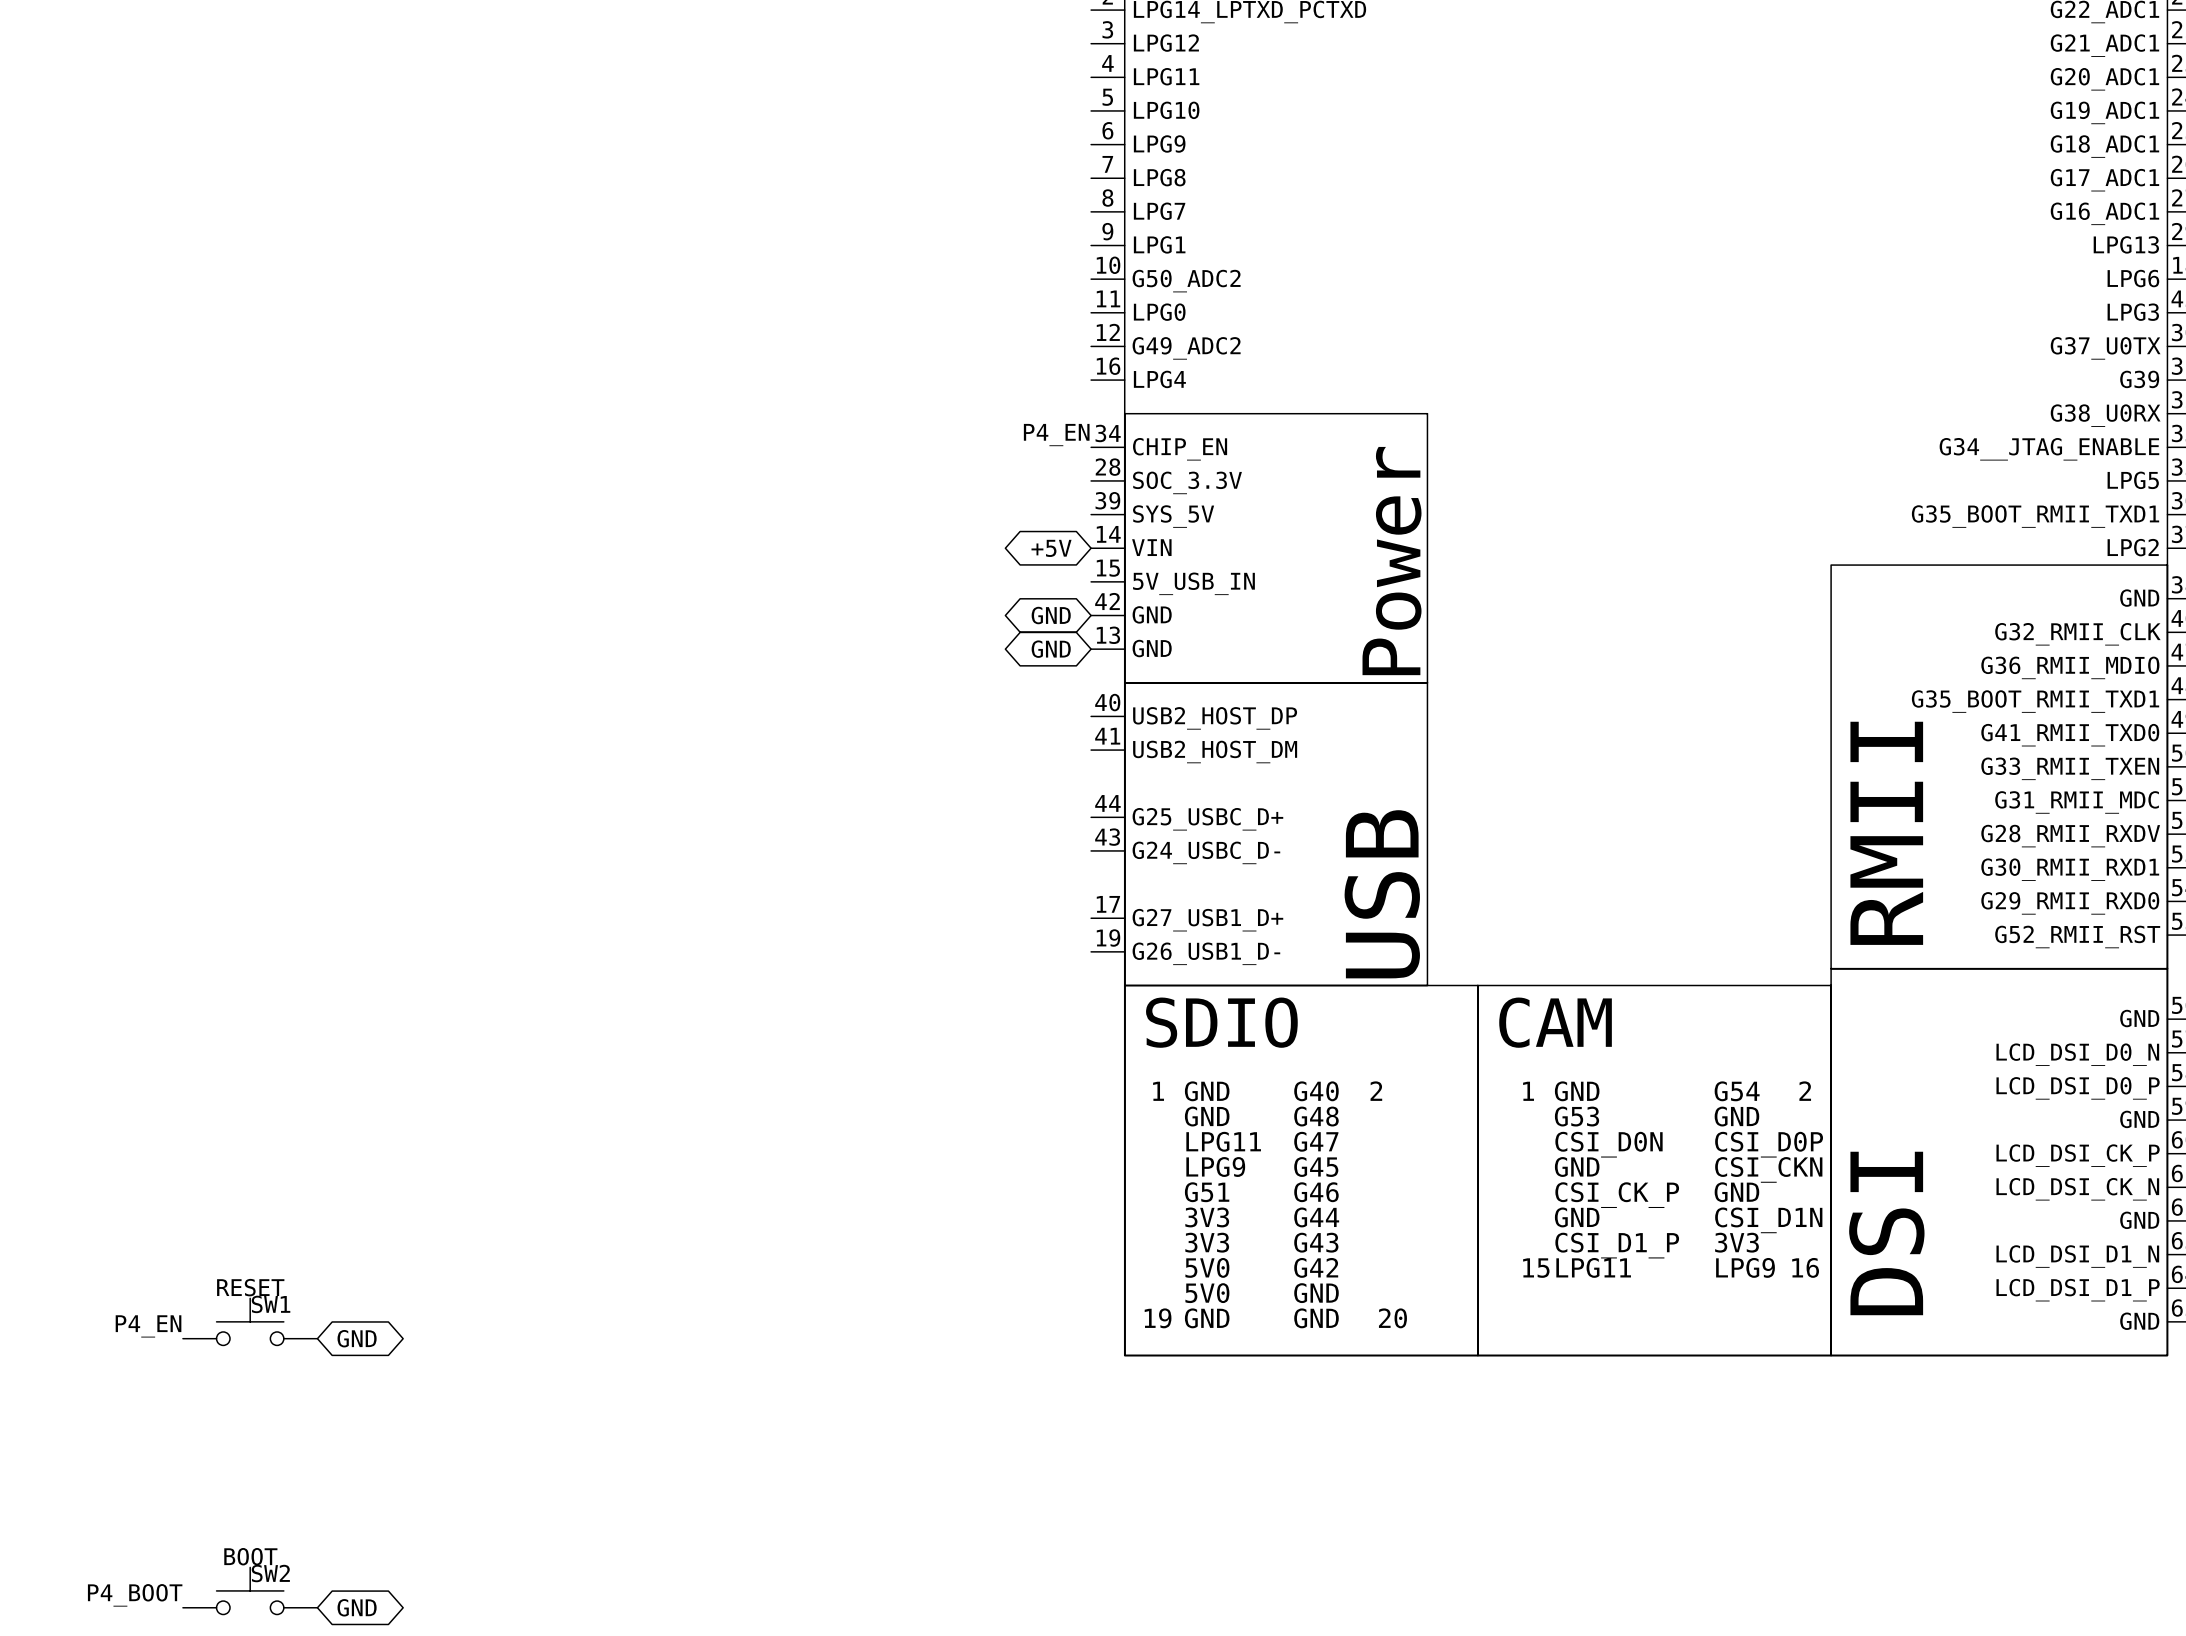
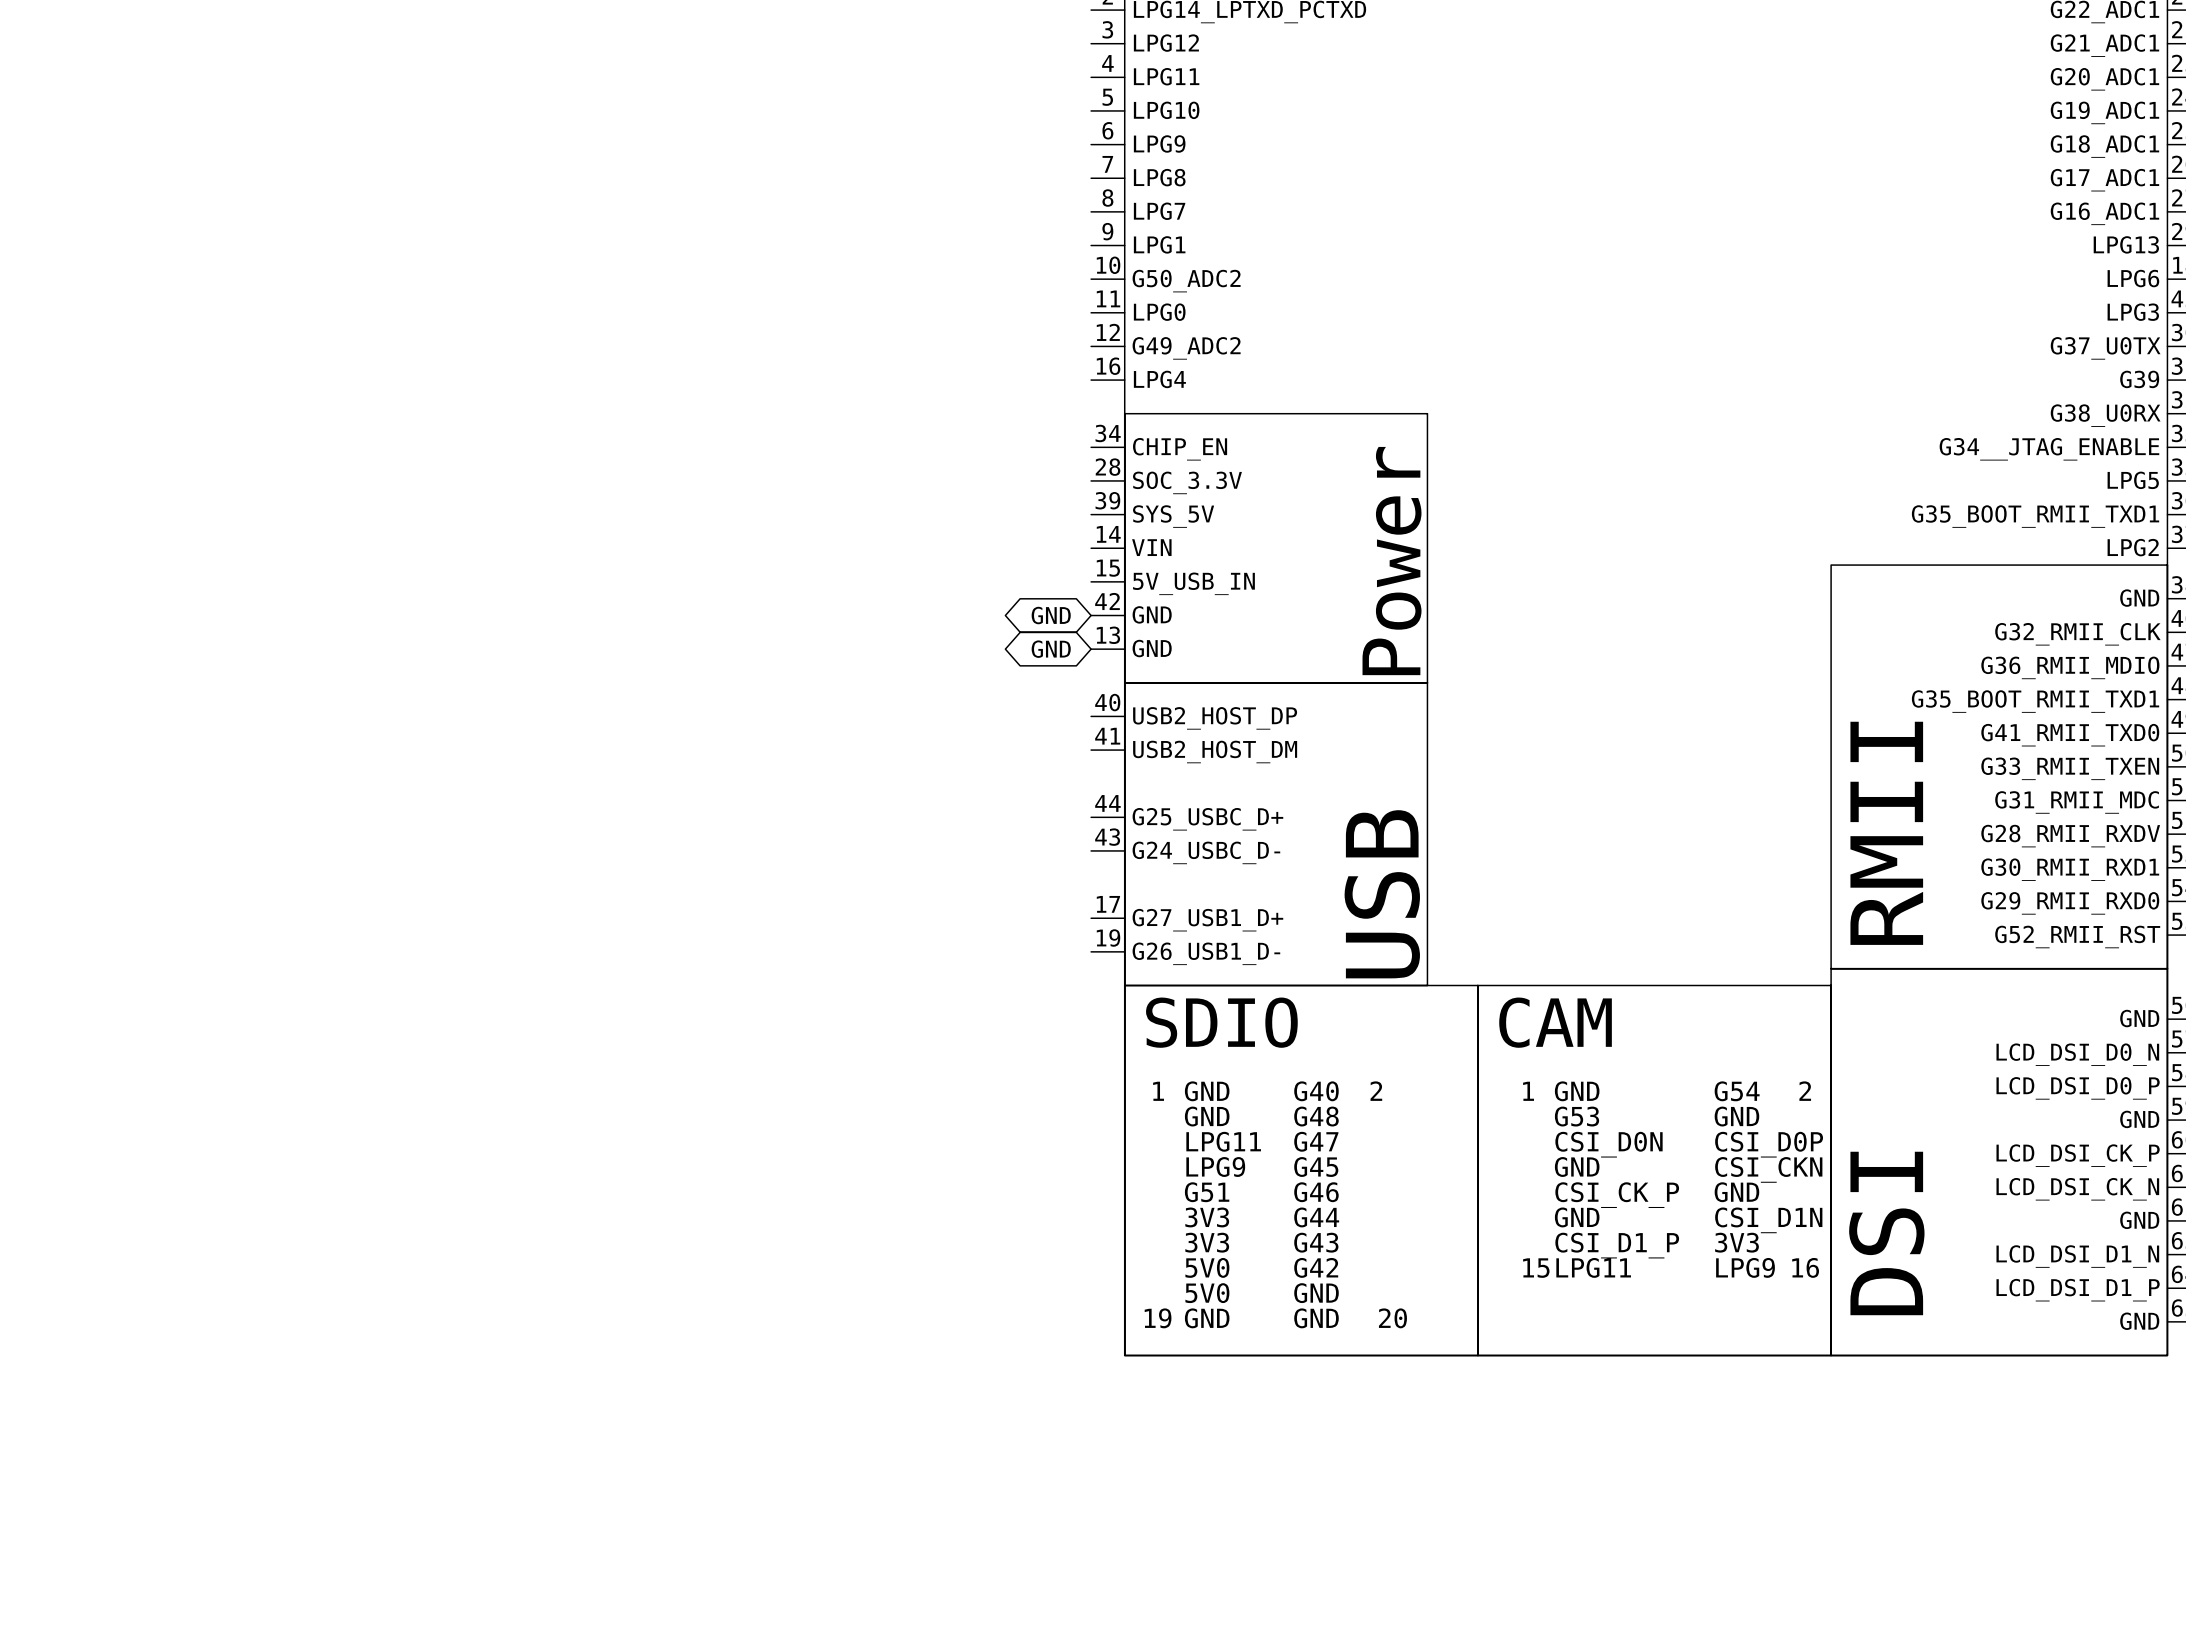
label: P4_EN (1056, 435) -> none
global label: +5V (1051, 548) -> none
SW1: RESET (250, 1321) -> none
label: P4_EN (148, 1326) -> none
global label: GND (357, 1338) -> none
SW2: BOOT (250, 1590) -> none
label: P4_BOOT (135, 1595) -> none
global label: GND (357, 1607) -> none

